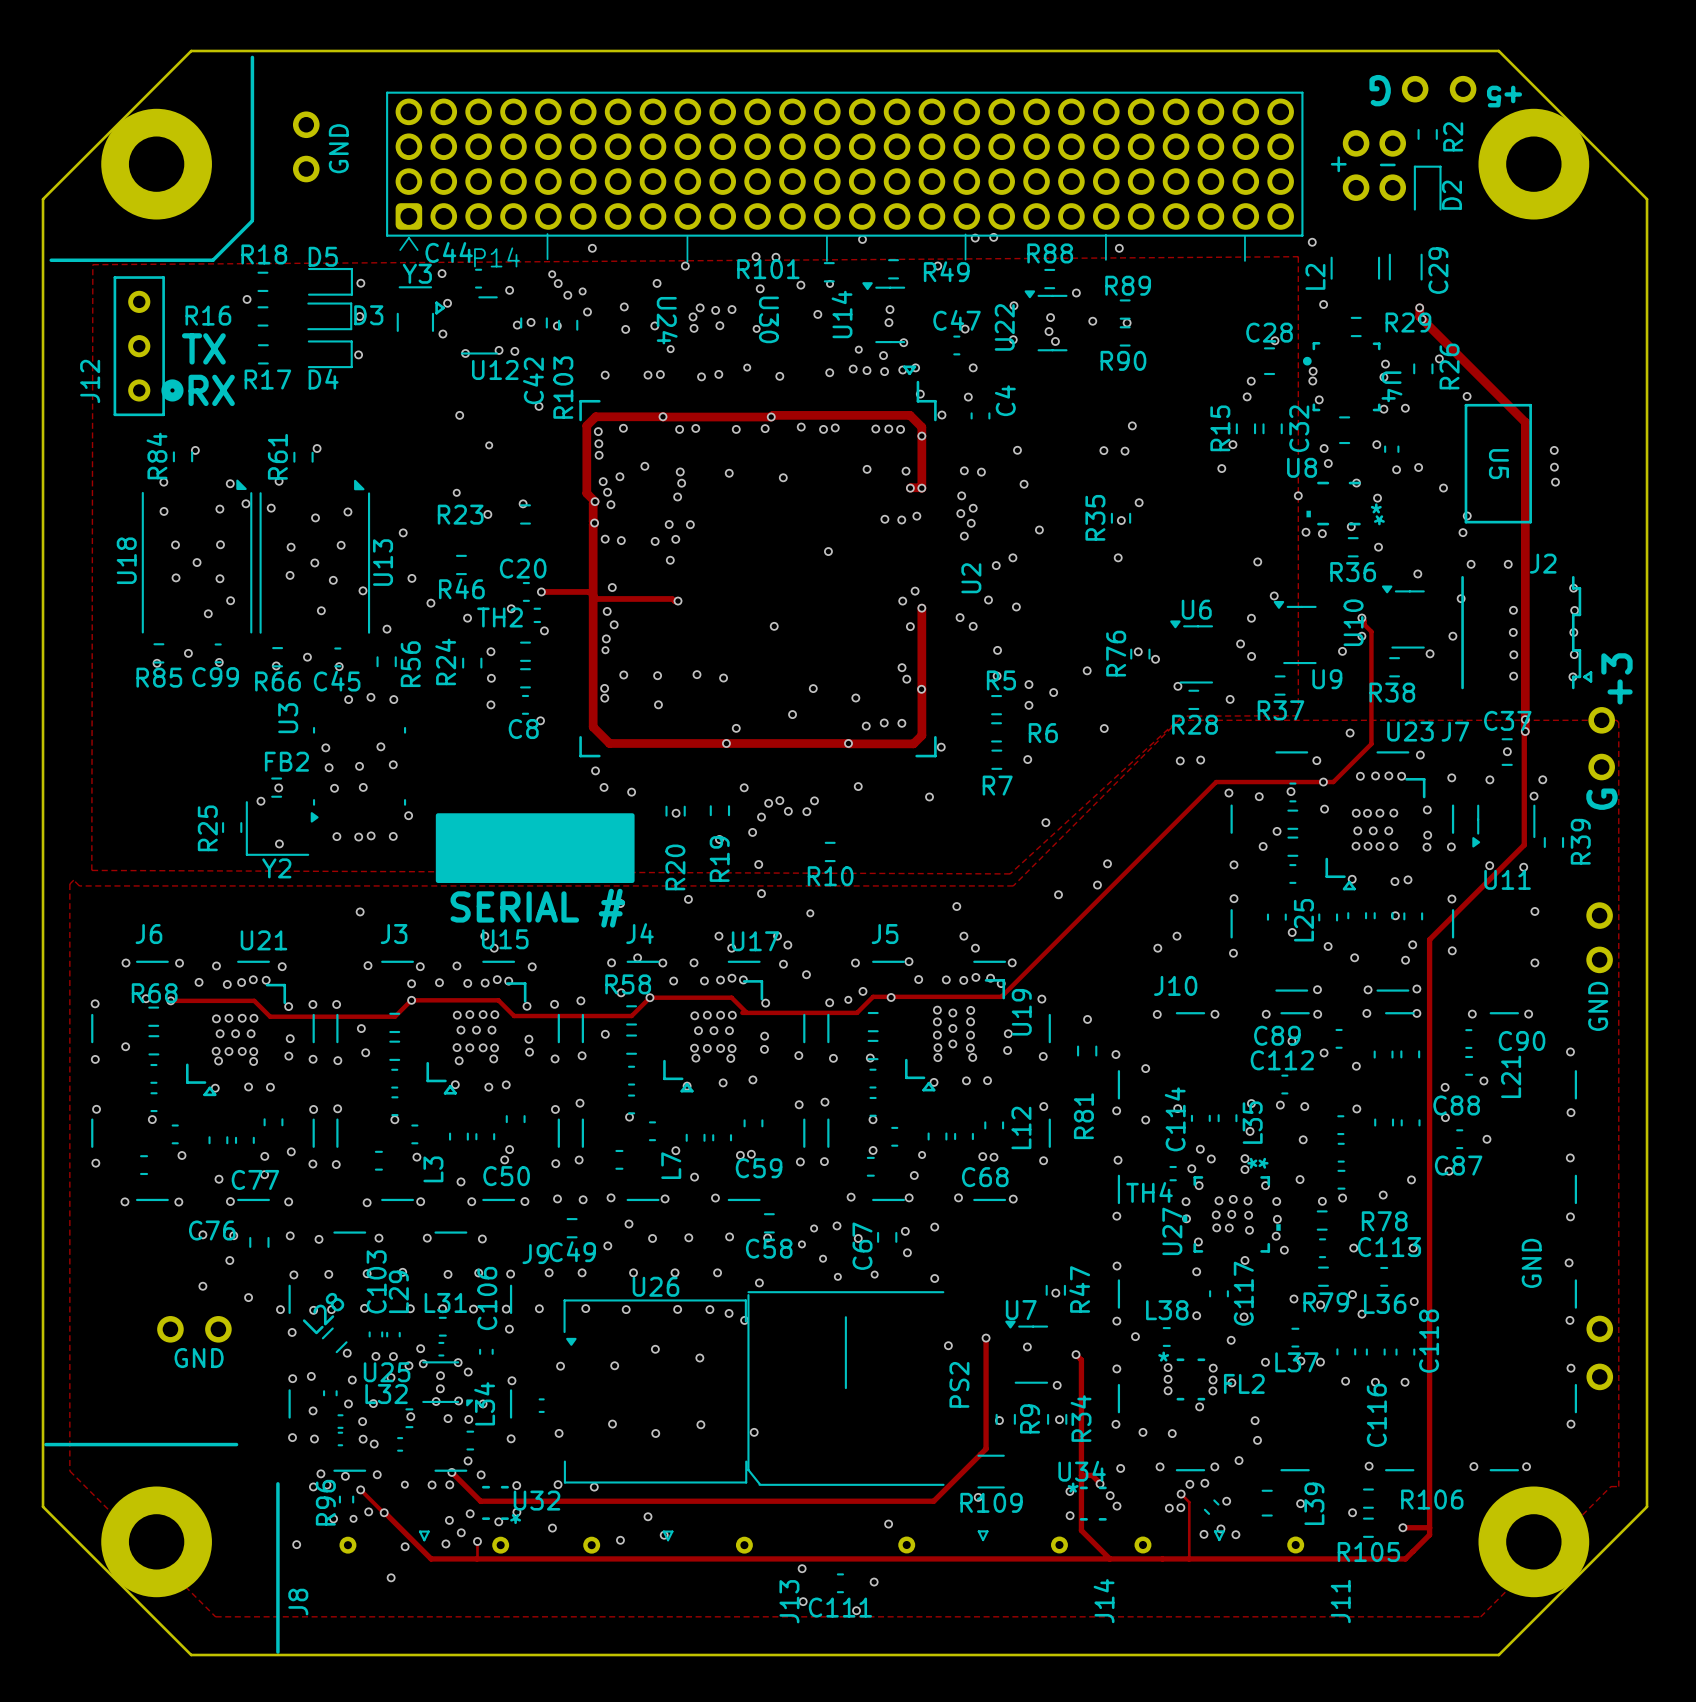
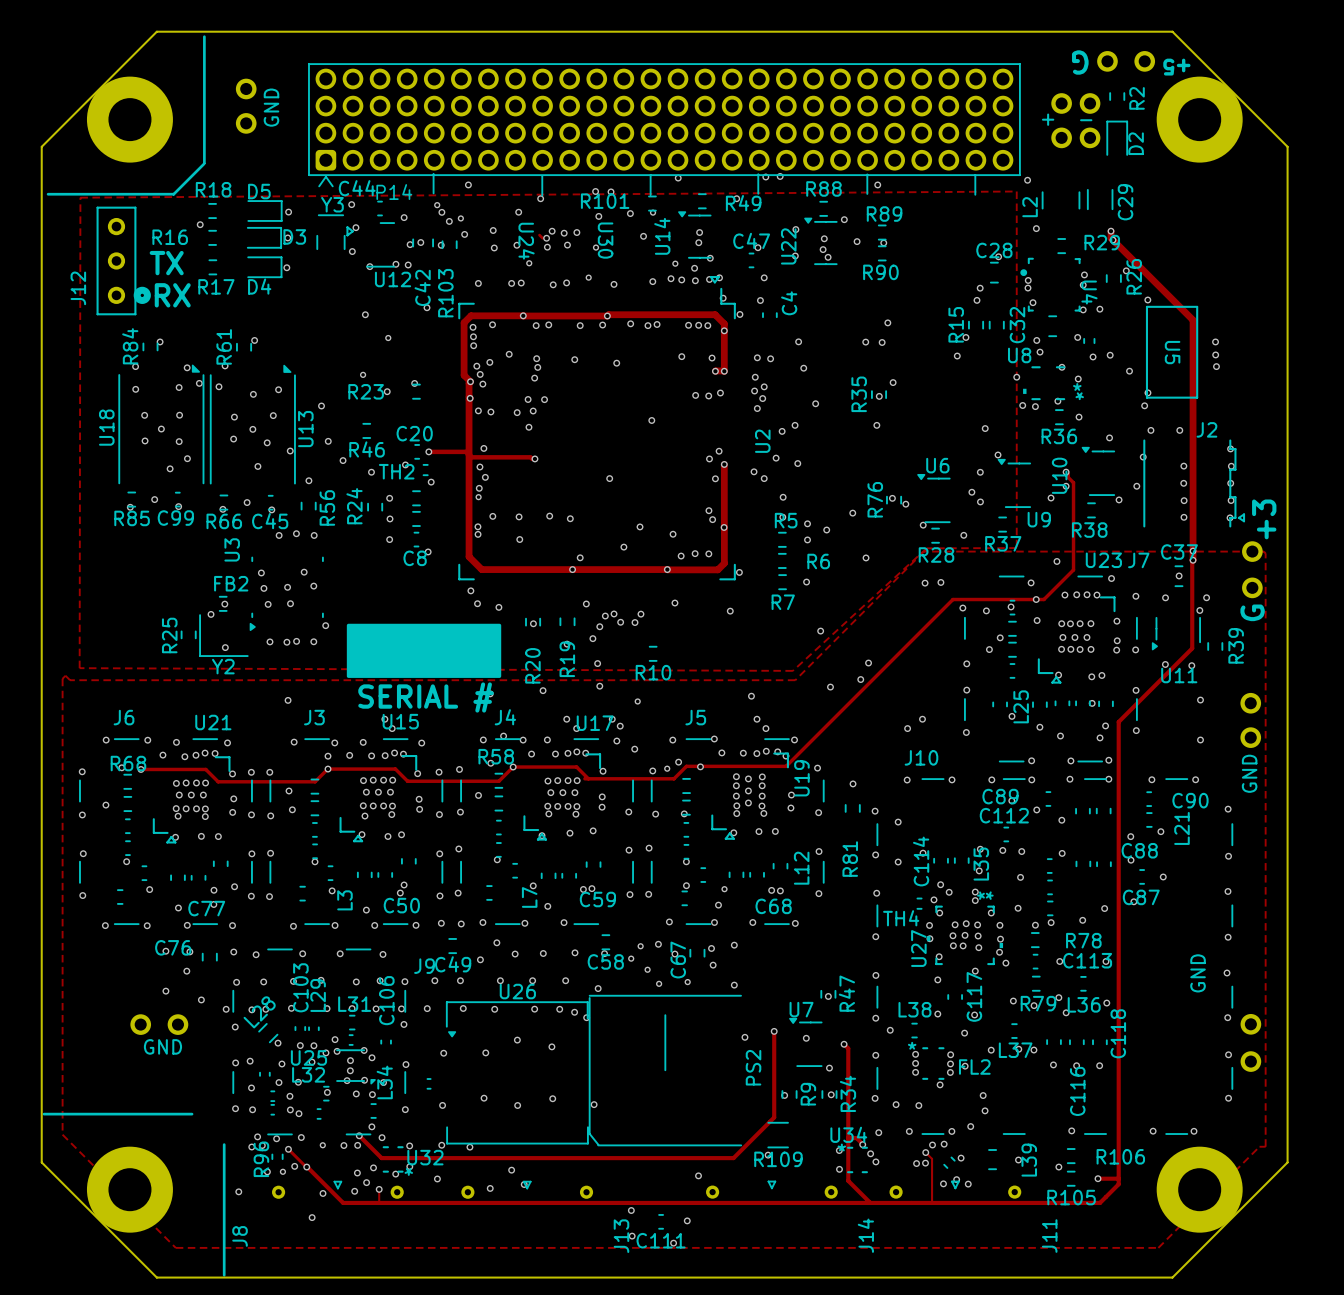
track: none -> (539, 235) (542, 238)

